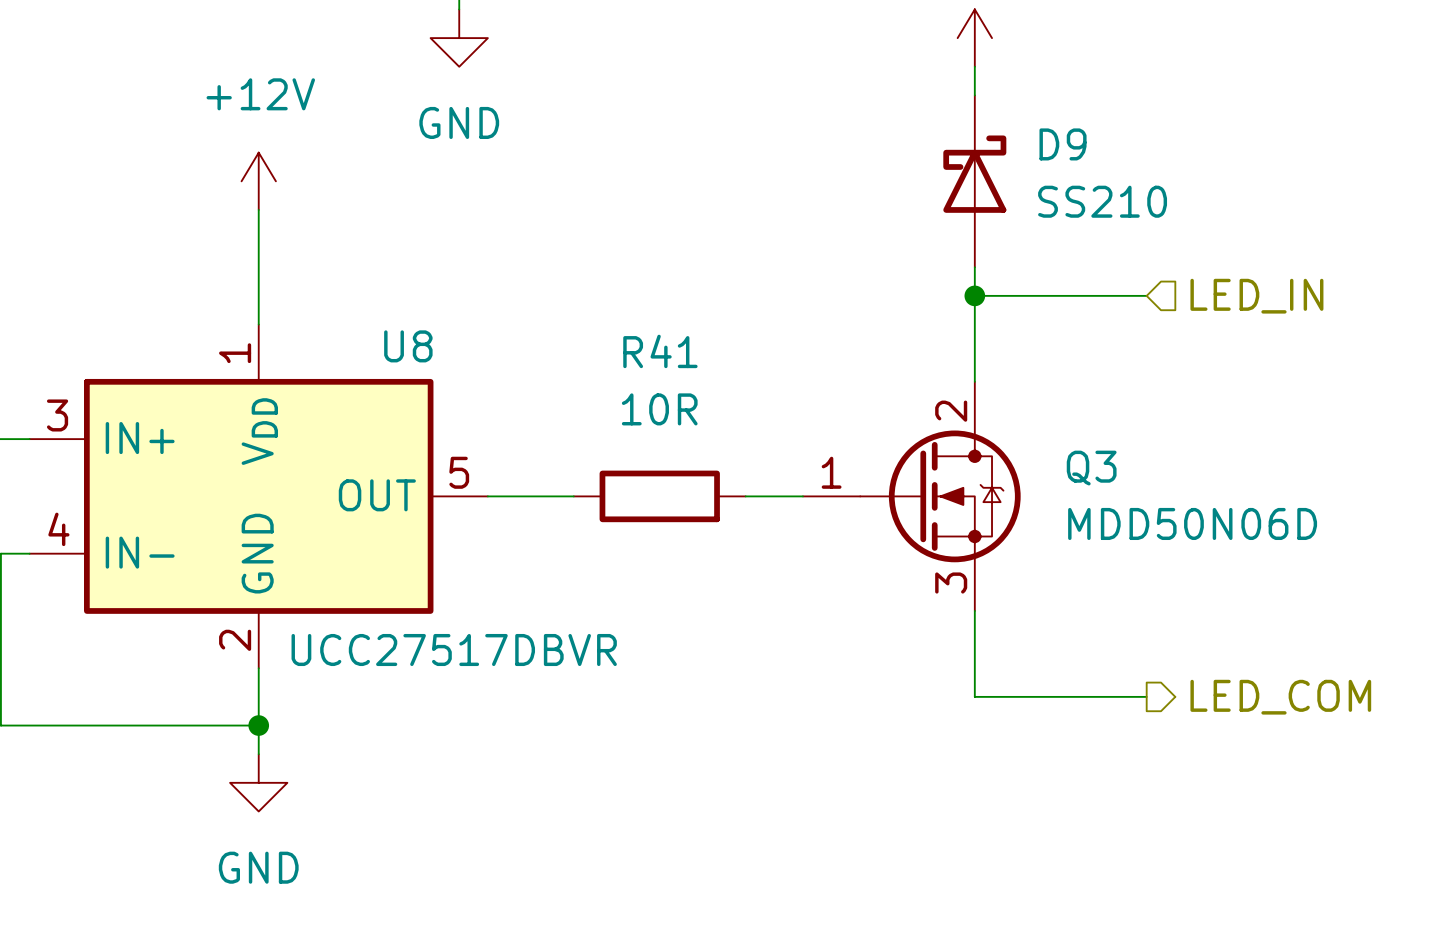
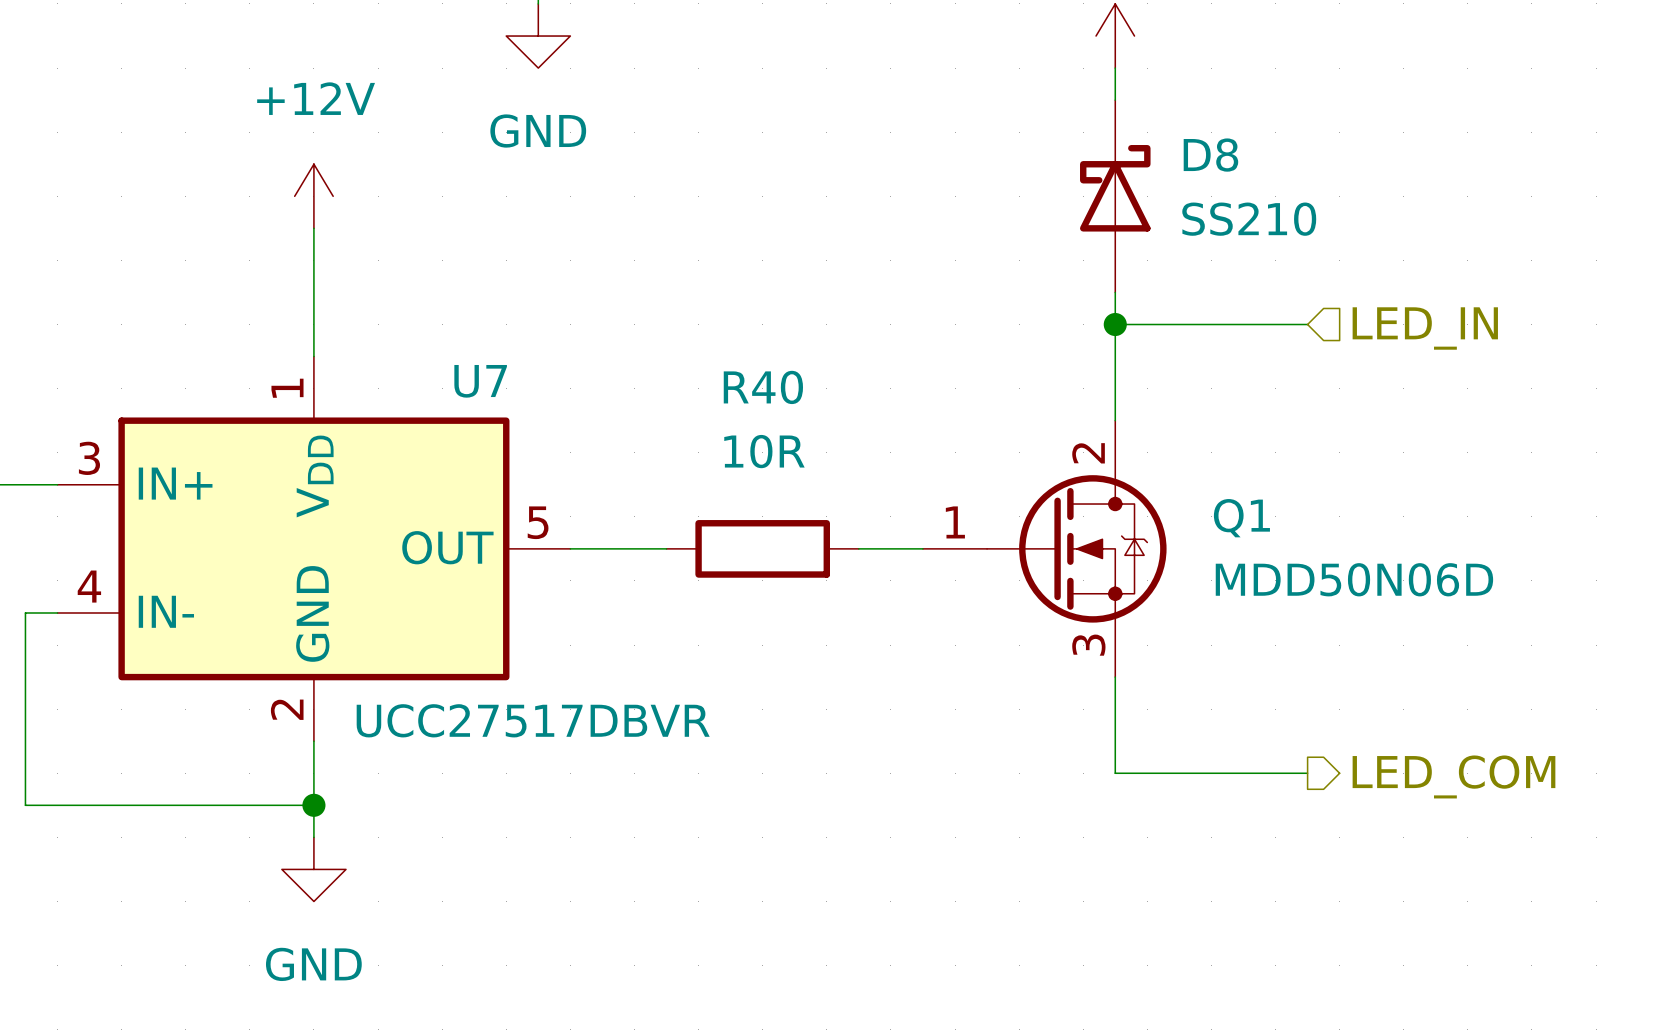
D9 name: D9 (1063, 144) -> D8 (1210, 155)
U8 name: U8 (408, 346) -> U7 (480, 381)
R41 name: R41 (660, 351) -> R40 (763, 387)
Q3 name: Q3 (1091, 468) -> Q1 (1241, 518)

